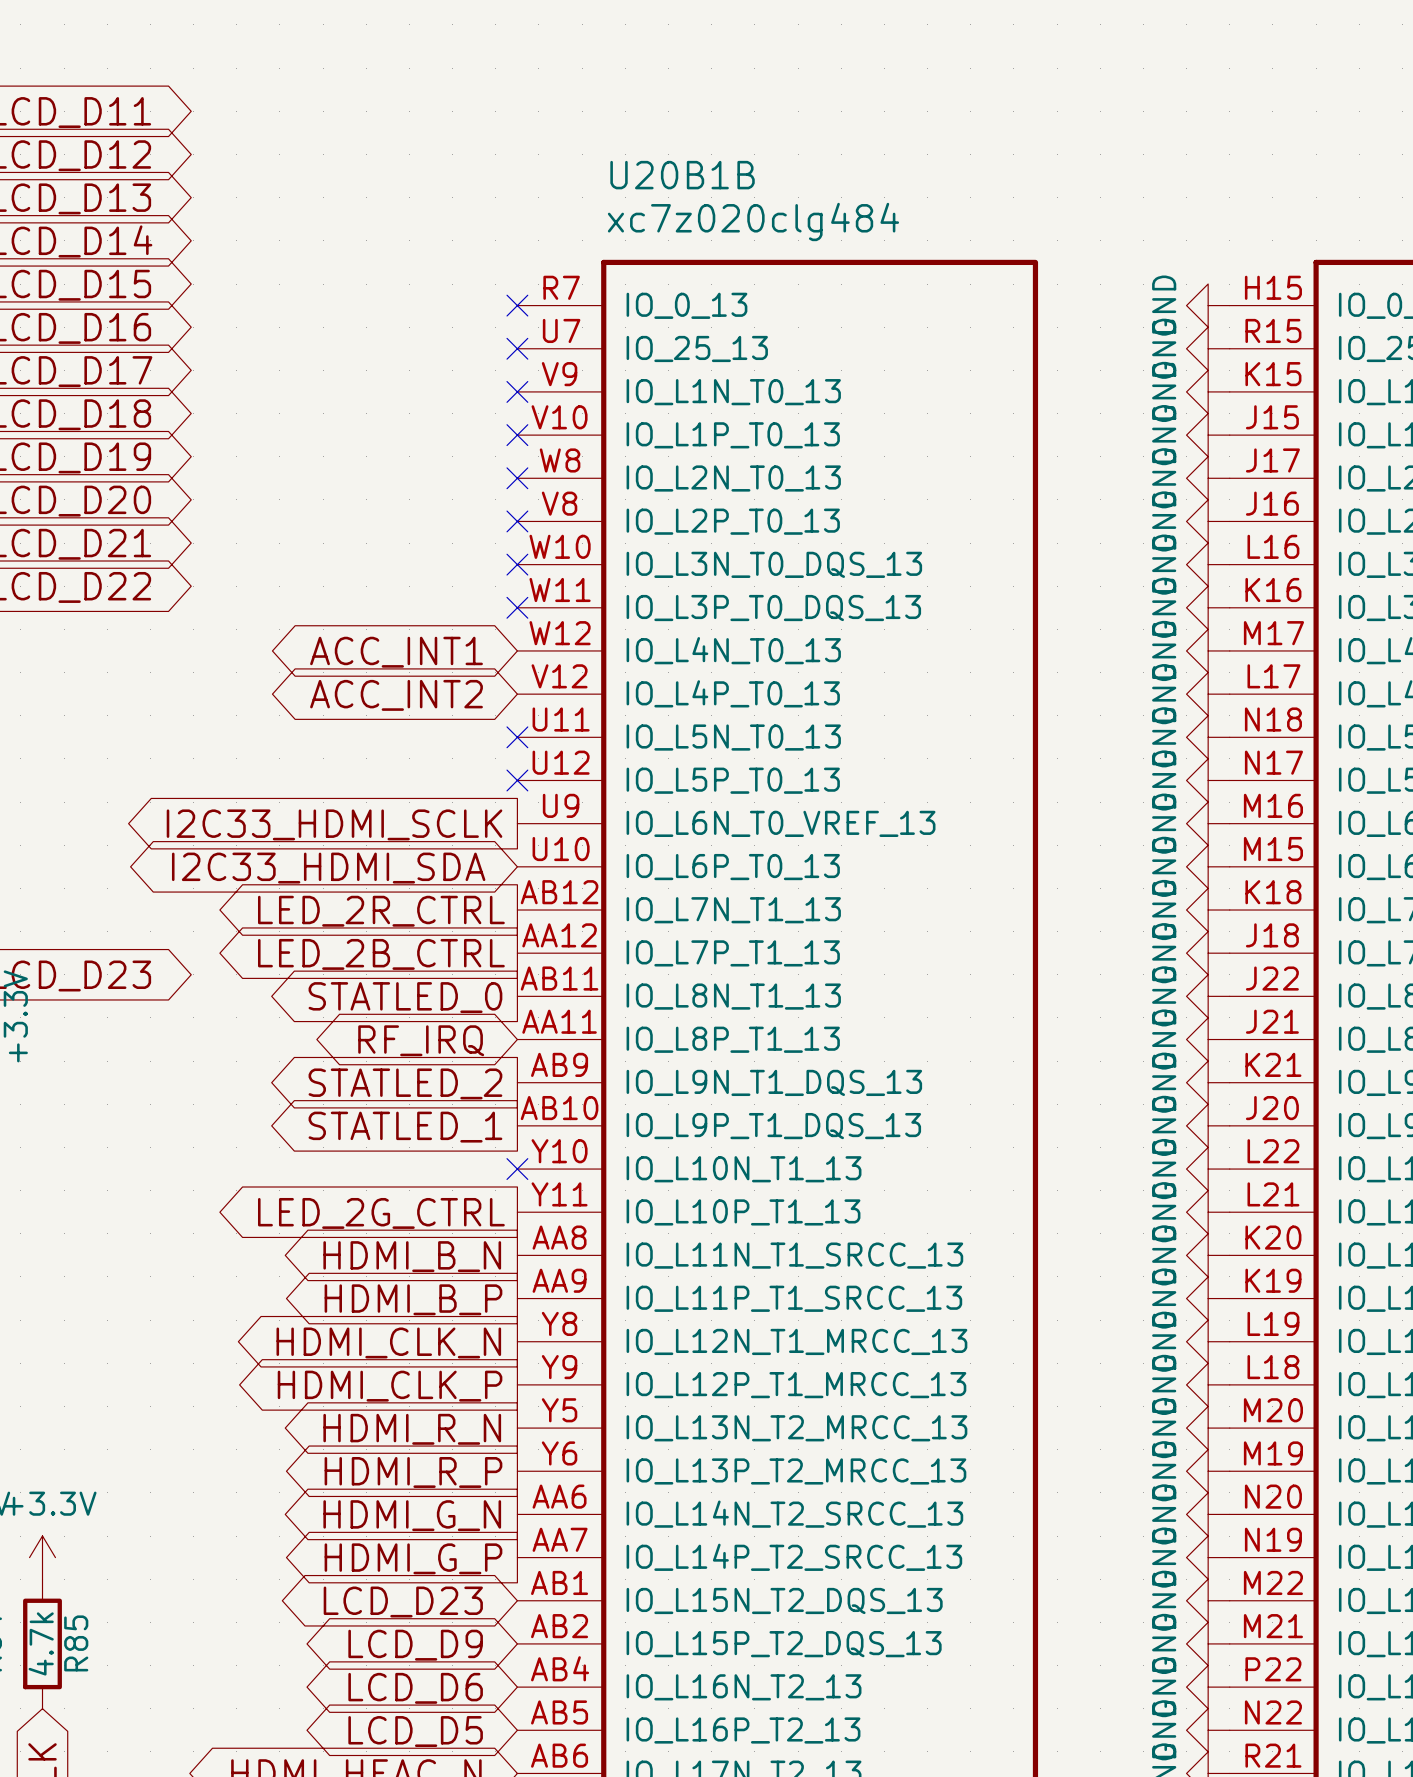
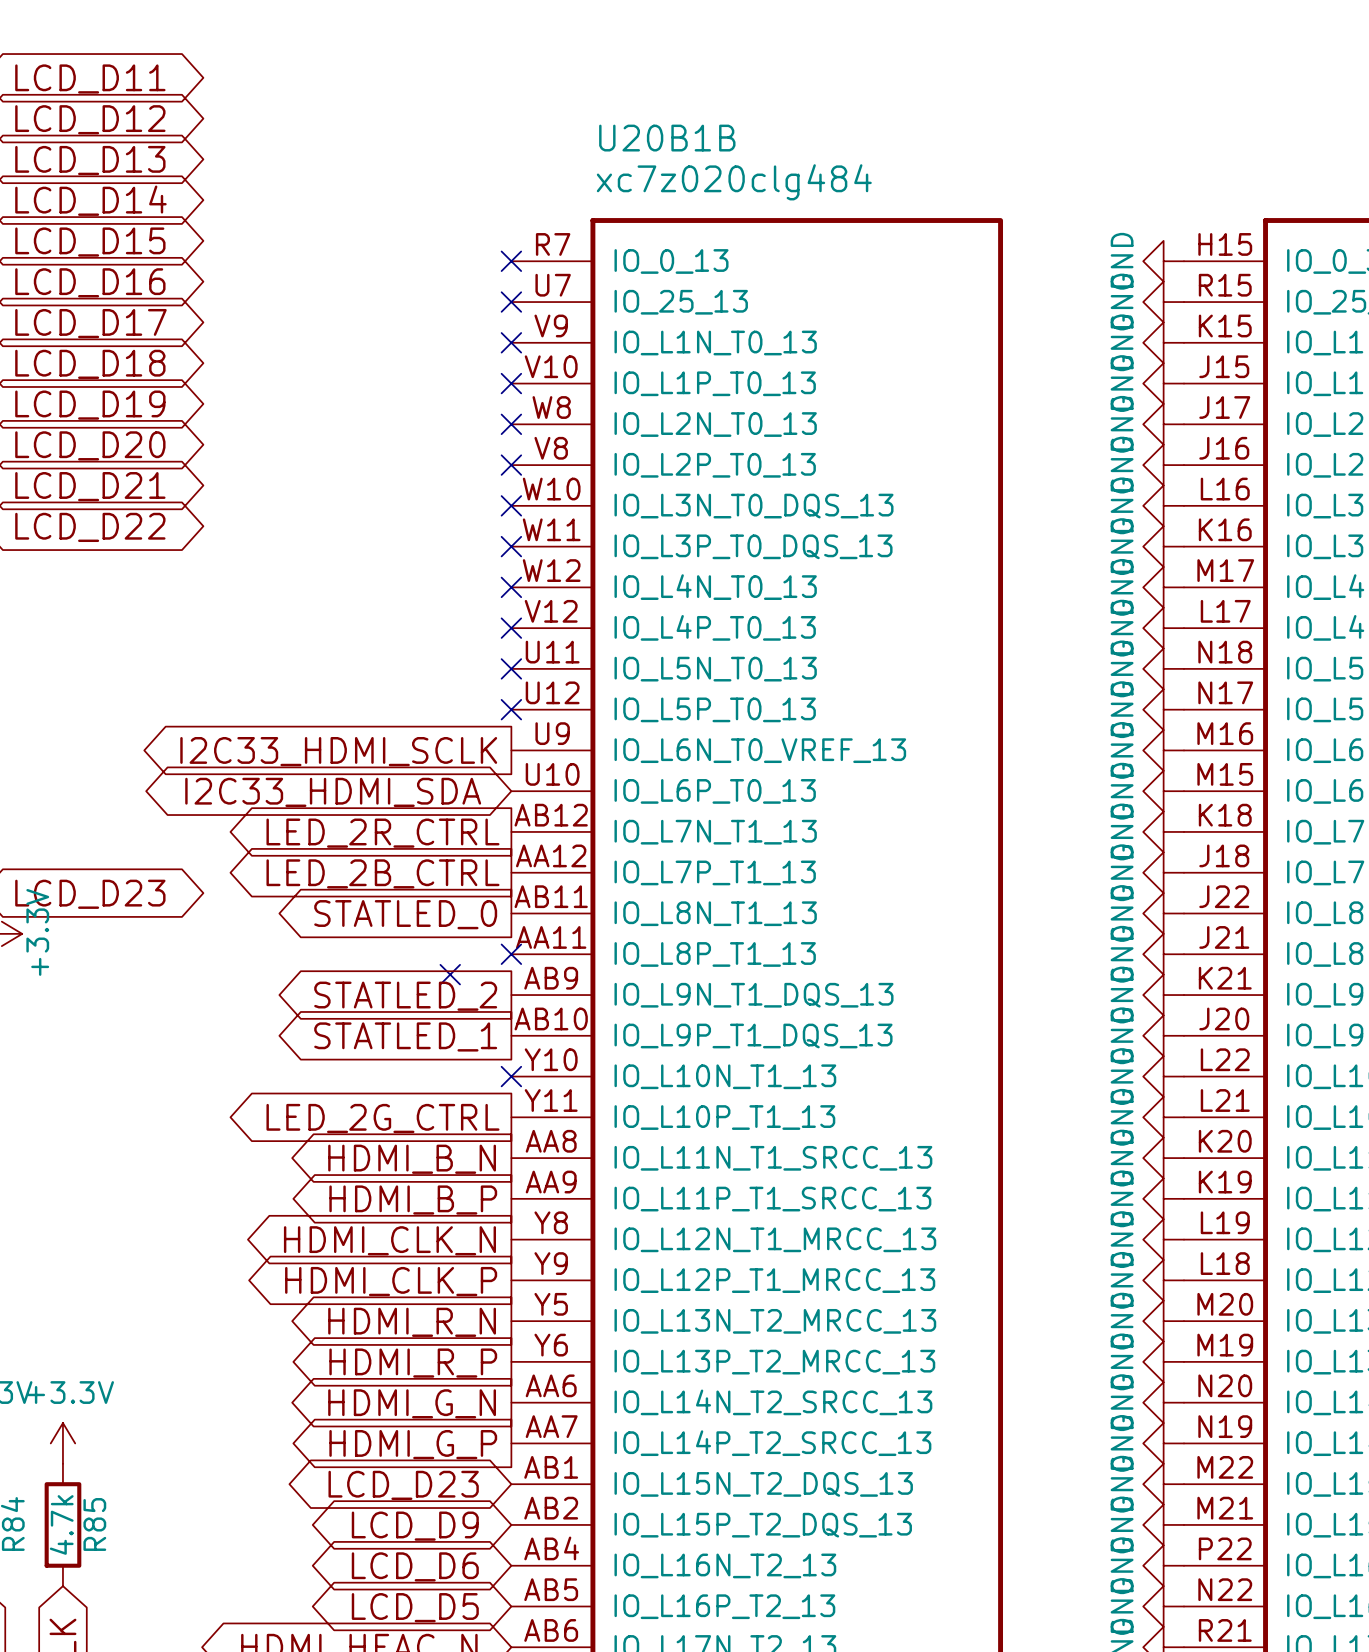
no-connect mark: none -> (511, 587)
global label: ACC_INT1 (396, 652) -> none
no-connect mark: none -> (511, 628)
global label: ACC_INT2 (396, 695) -> none
no-connect mark: none -> (511, 954)
global label: RF_IRQ (421, 1040) -> none
no-connect mark: none -> (450, 974)

